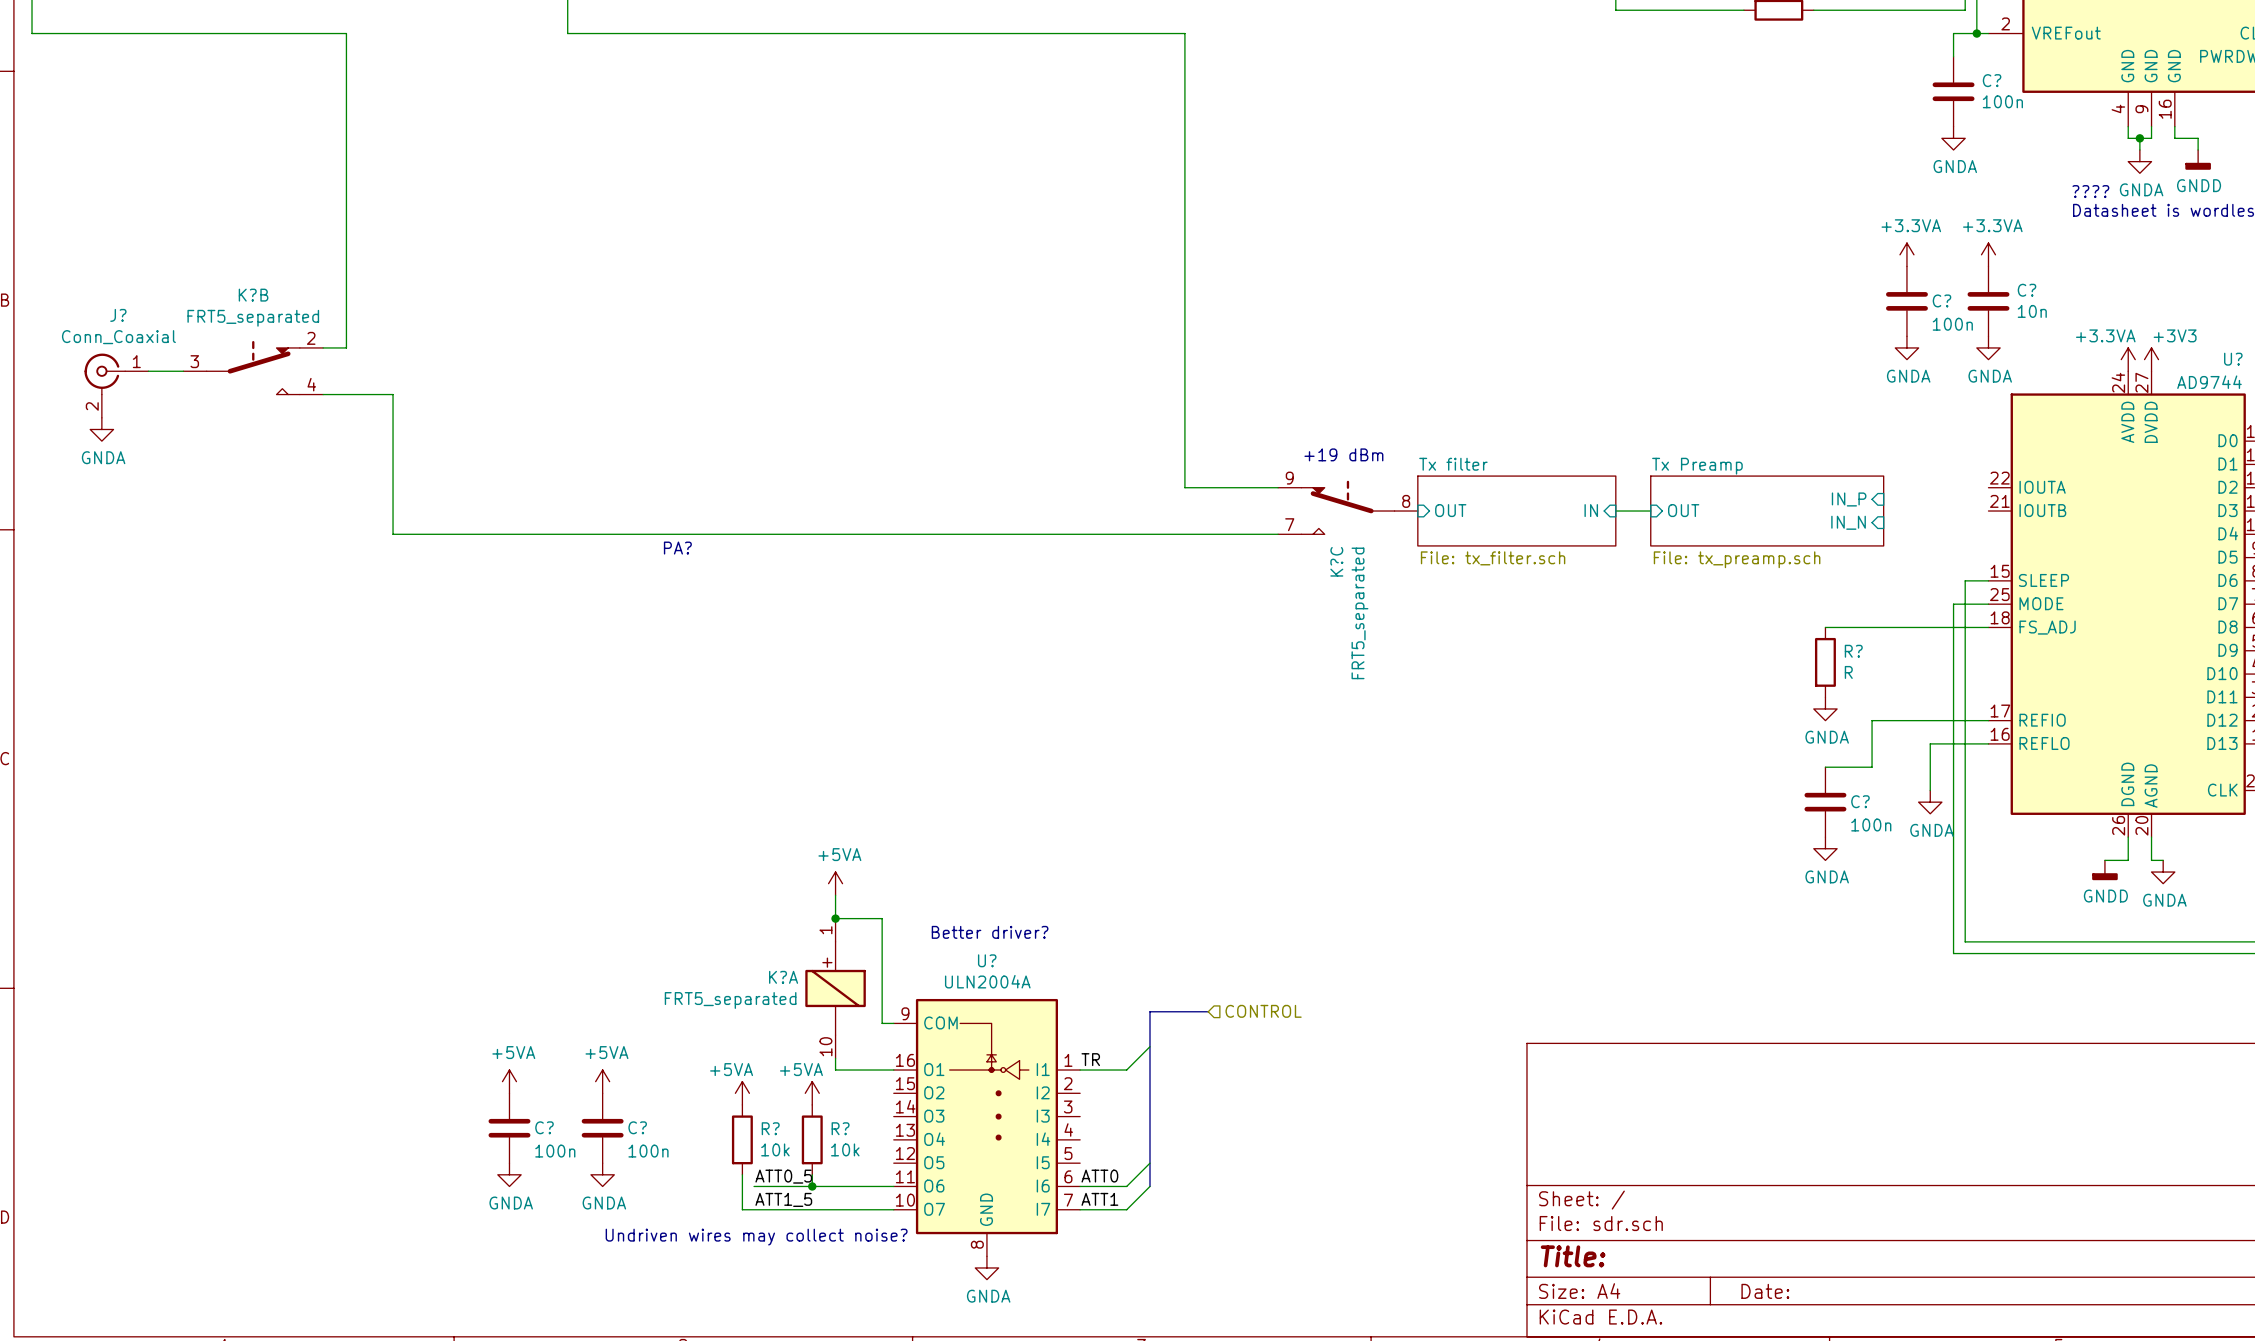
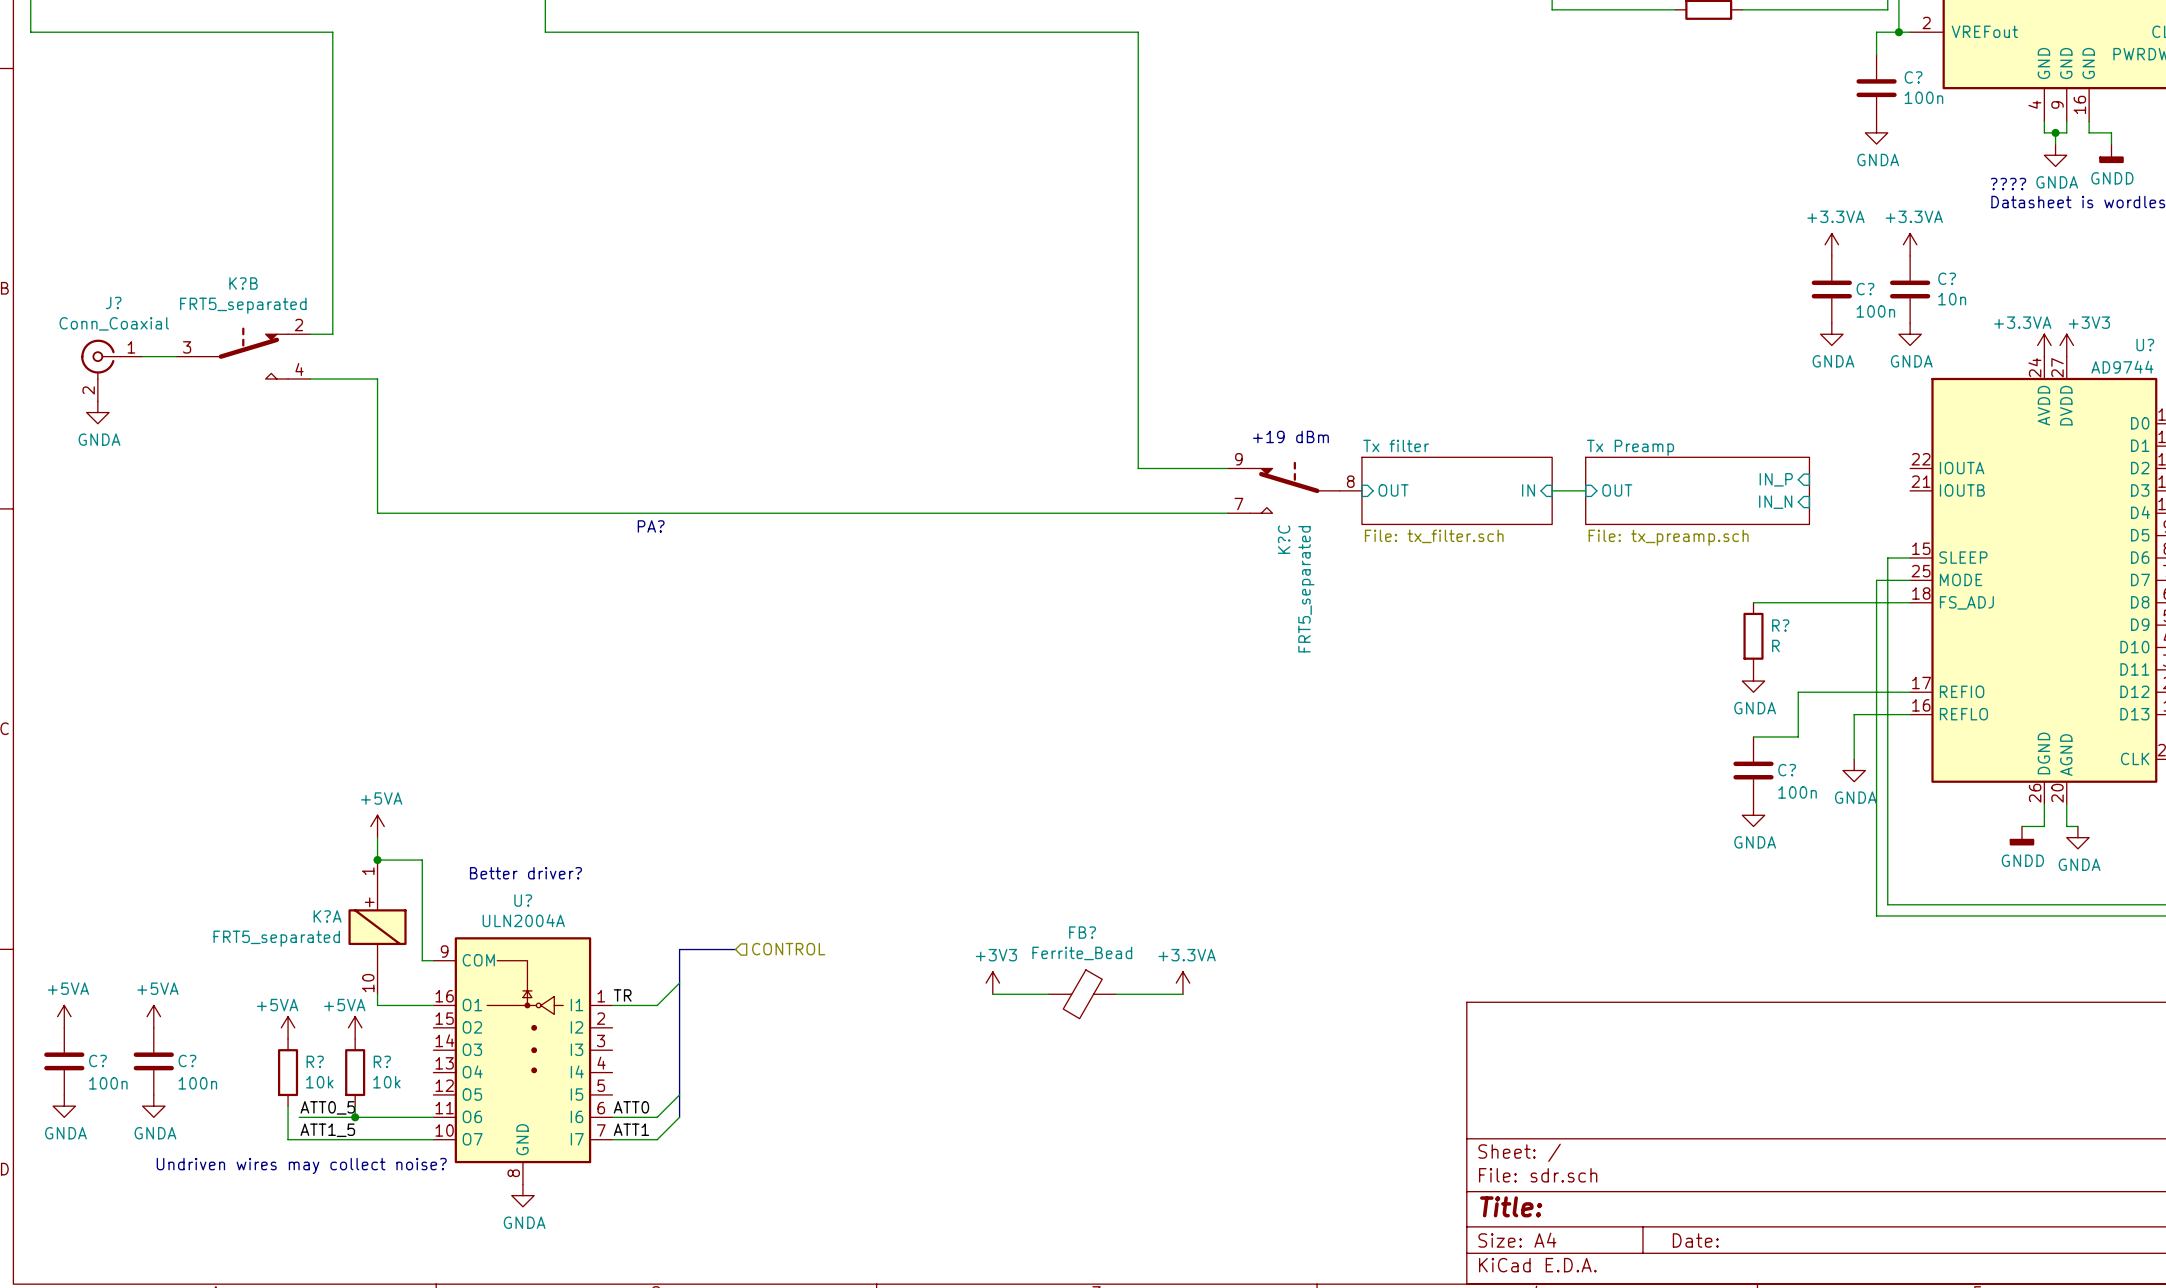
power symbol: none -> +5VA (377, 826)
wire: none -> (377, 837) (377, 860) (422, 860) (422, 960) (433, 960)
power symbol: +5VA (835, 883) -> none
junction: none -> (377, 860)
wire: (835, 895) (835, 918) (882, 918) (882, 1023) (893, 1023) -> none
text: none -> Better driver? (525, 873)
junction: (835, 918) -> none
text: Better driver? (990, 932) -> none
K?A: none -> FRT5_separated (377, 927)
bus: none -> (735, 949) (679, 949) (679, 1117)
hierarchical label: none -> CONTROL (788, 949)
K?A: FRT5_separated (835, 988) -> none
bus: (1208, 1011) (1149, 1011) (1149, 1186) -> none
hierarchical label: CONTROL (1263, 1011) -> none
wire: none -> (679, 983) (657, 1005) (612, 1005)
power symbol: none -> +3V3 (992, 983)
power symbol: none -> +3.3VA (1182, 983)
wire: none -> (377, 994) (377, 1005) (433, 1005)
wire: none -> (992, 994) (1048, 994)
FB?: none -> Ferrite_Bead (1082, 994)
wire: none -> (1115, 994) (1182, 994)
label: none -> TR (622, 995)
wire: (1149, 1046) (1126, 1070) (1080, 1070) -> none
power symbol: none -> +5VA (64, 1016)
power symbol: none -> +5VA (153, 1016)
wire: (835, 1058) (835, 1070) (893, 1070) -> none
label: TR (1090, 1059) -> none
power symbol: none -> +5VA (288, 1027)
power symbol: none -> +5VA (355, 1027)
power symbol: +5VA (509, 1081) -> none
power symbol: +5VA (602, 1081) -> none
power symbol: +5VA (742, 1093) -> none
power symbol: +5VA (812, 1093) -> none
C?: none -> 100n (64, 1061)
C?: none -> 100n (153, 1061)
U?: none -> ULN2004A (522, 1060)
R?: none -> 10k (288, 1072)
R?: none -> 10k (355, 1072)
U?: ULN2004A (986, 1127) -> none
C?: 100n (509, 1128) -> none
C?: 100n (602, 1128) -> none
wire: none -> (679, 1094) (657, 1117) (612, 1117)
R?: 10k (742, 1139) -> none
R?: 10k (812, 1139) -> none
power symbol: none -> GNDA (64, 1106)
power symbol: none -> GNDA (153, 1106)
wire: none -> (288, 1106) (288, 1139) (433, 1139)
wire: none -> (355, 1106) (355, 1117)
label: none -> ATT0 (631, 1107)
label: none -> ATT0_5 (327, 1107)
wire: none -> (299, 1117) (433, 1117)
junction: none -> (355, 1117)
wire: none -> (679, 1117) (657, 1139) (612, 1139)
wire: (1149, 1163) (1126, 1186) (1080, 1186) -> none
power symbol: GNDA (509, 1174) -> none
power symbol: GNDA (602, 1174) -> none
wire: (742, 1174) (742, 1209) (893, 1209) -> none
wire: (812, 1174) (812, 1186) -> none
label: none -> ATT1_5 (327, 1130)
label: none -> ATT1 (631, 1129)
label: ATT0_5 (783, 1176) -> none
label: ATT0 (1099, 1176) -> none
wire: (754, 1186) (893, 1186) -> none
junction: (812, 1186) -> none
wire: (1149, 1186) (1126, 1209) (1080, 1209) -> none
label: ATT1_5 (783, 1199) -> none
label: ATT1 (1099, 1199) -> none
text: none -> Undriven wires may collect noise? (301, 1165)
text: Undriven wires may collect noise? (756, 1237) -> none
power symbol: none -> GNDA (522, 1195)
power symbol: GNDA (986, 1267) -> none

